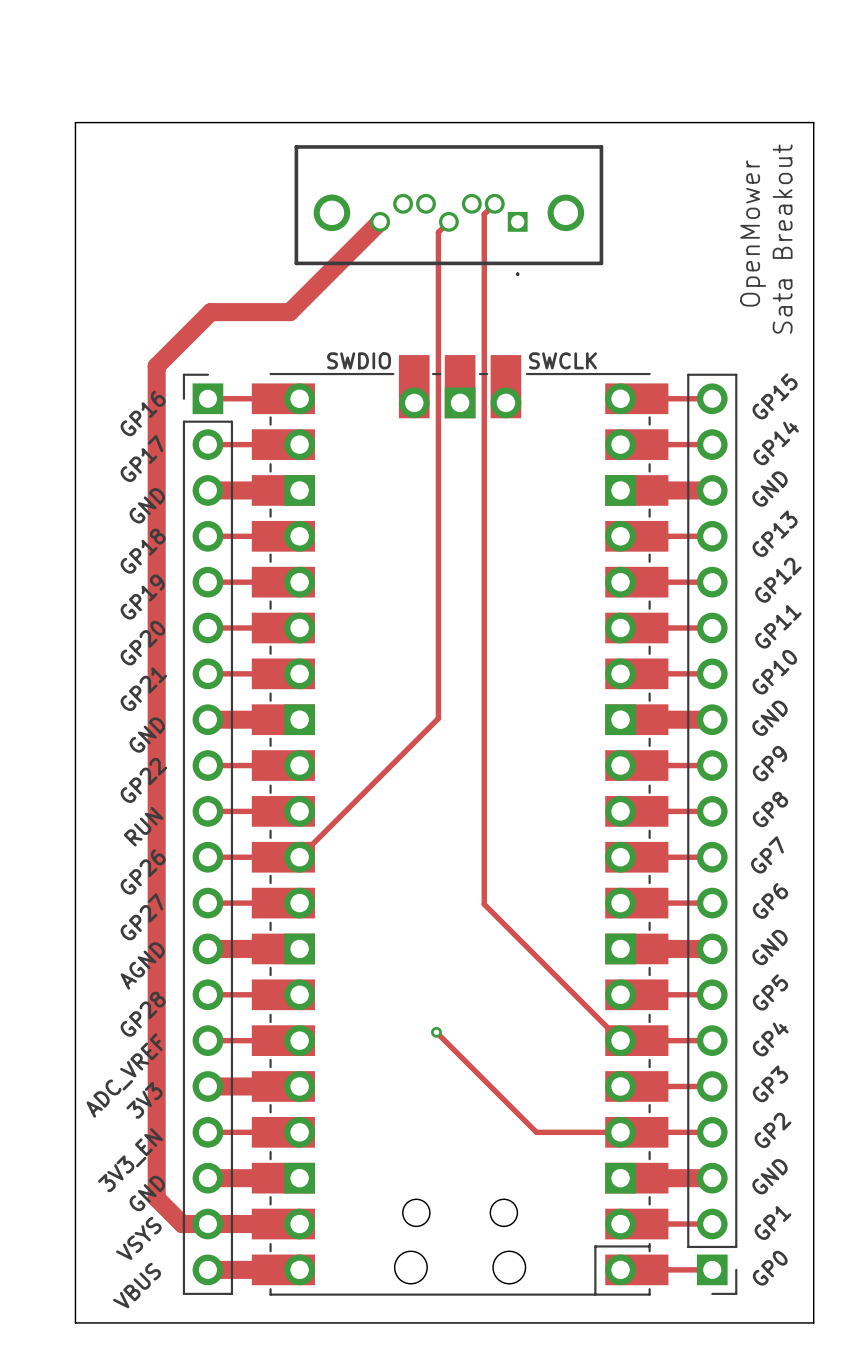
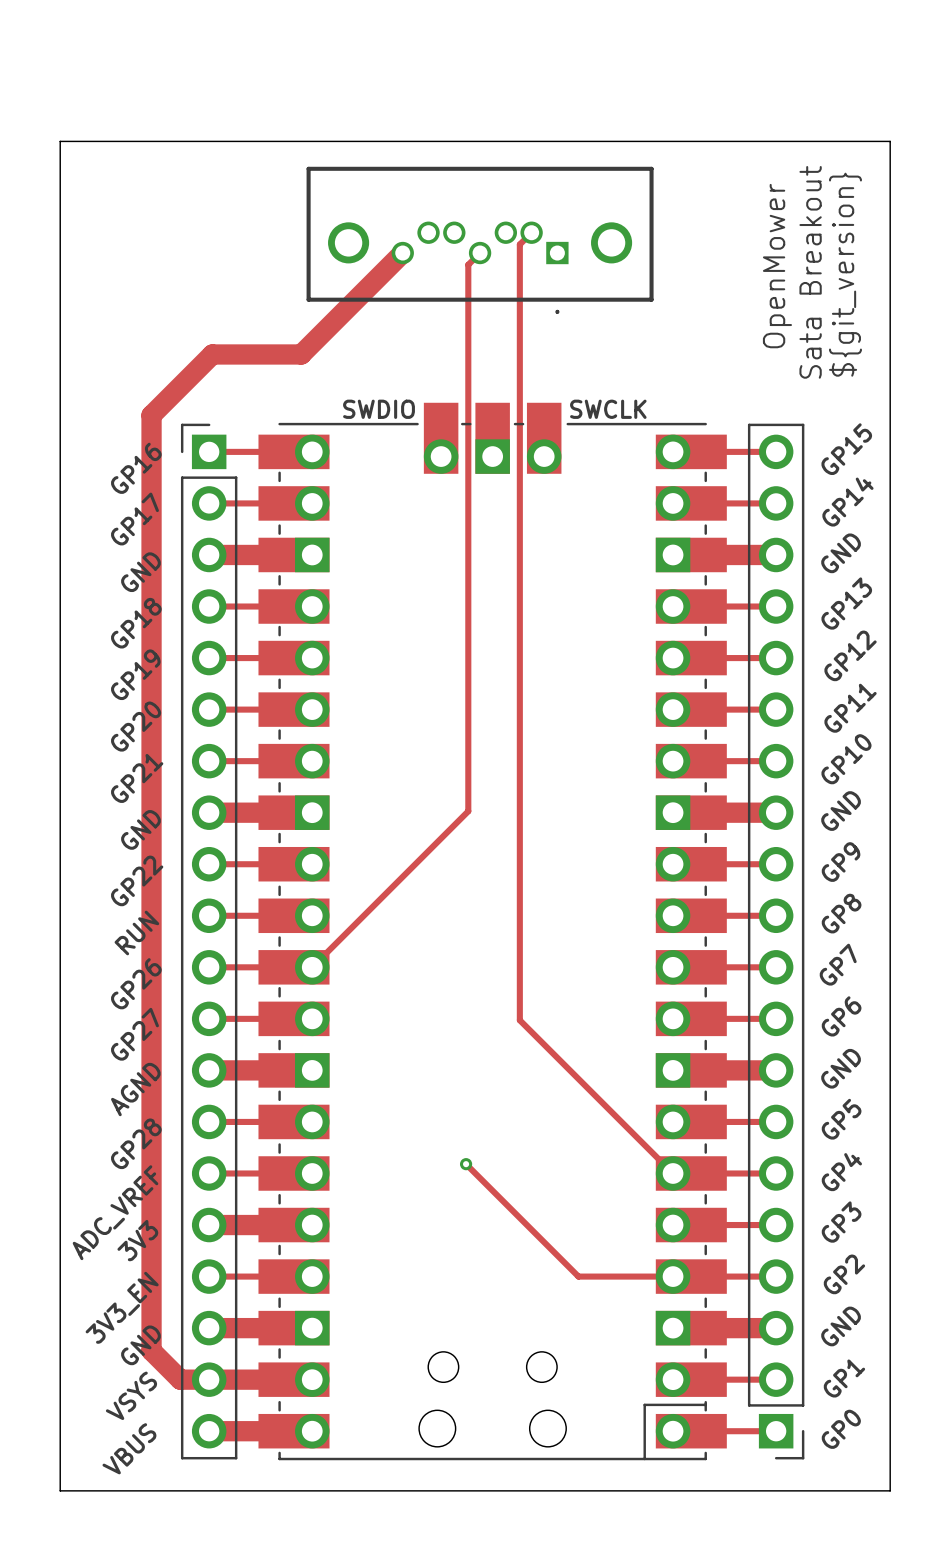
text position: OpenMower (753, 233) -> OpenMower (777, 266)
text: none -> Sata Breakout (810, 272)
text: Sata Breakout (782, 239) -> ${git_version} (845, 274)

